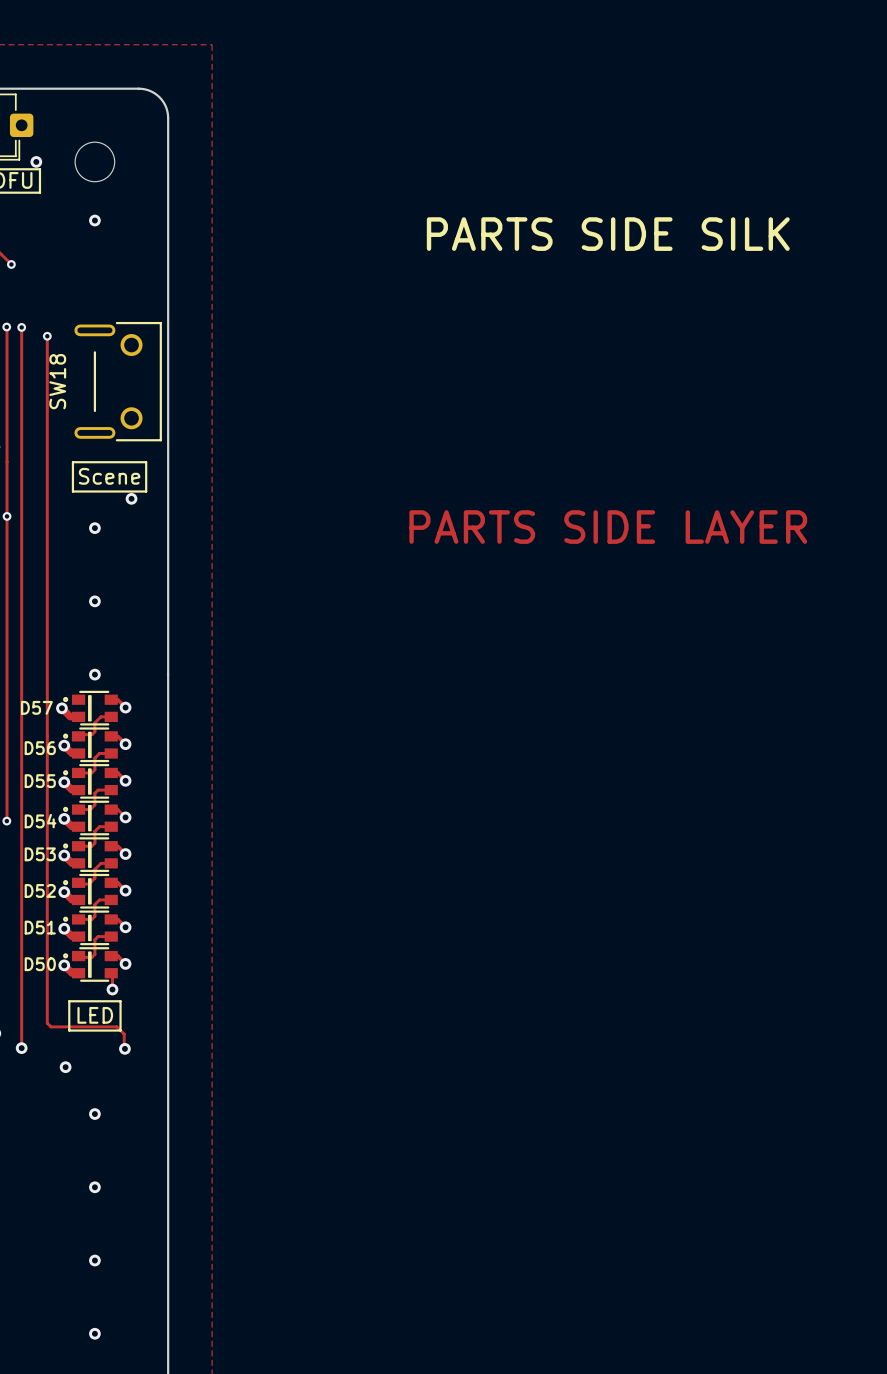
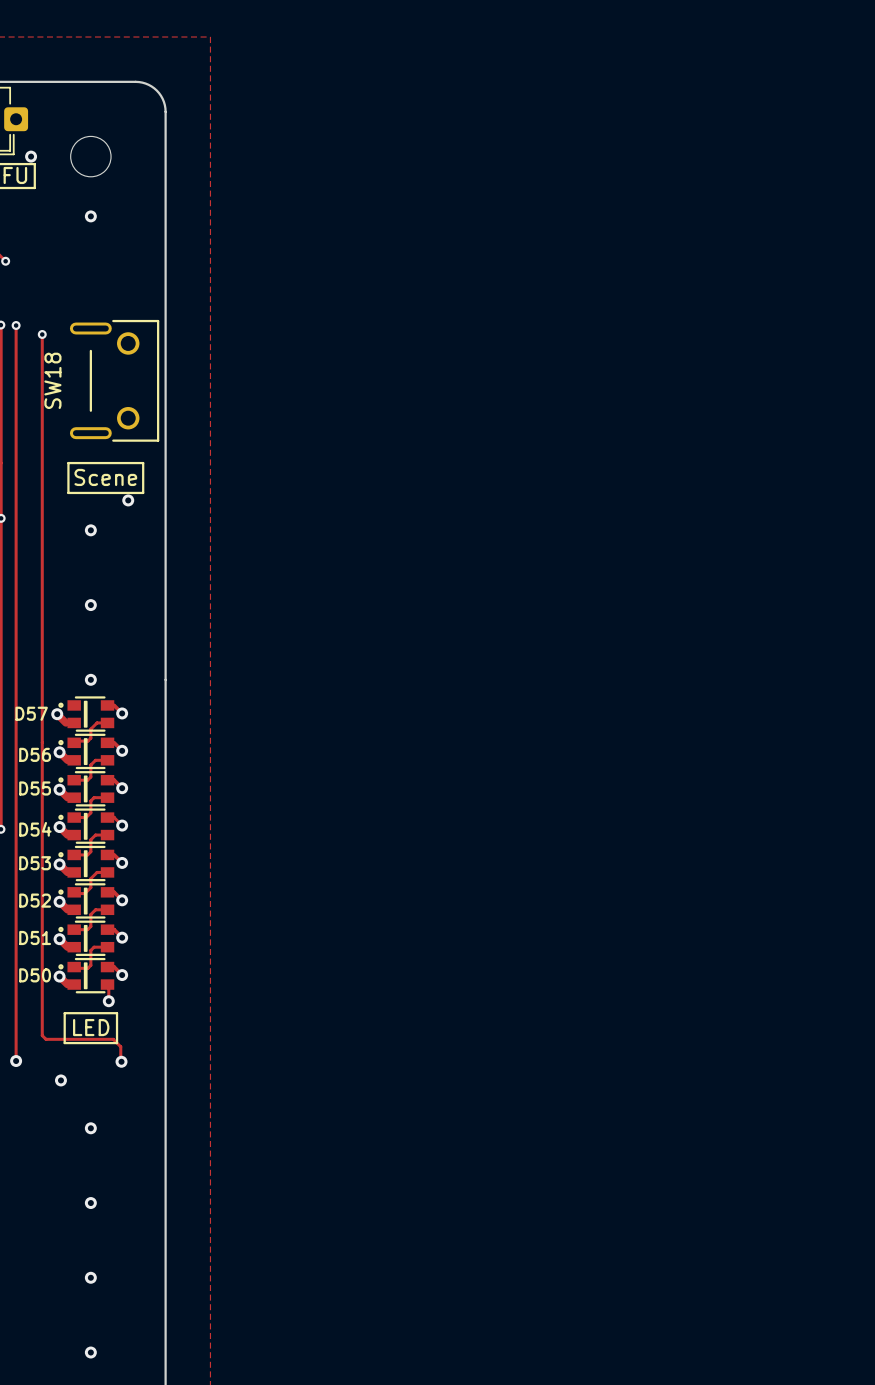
text: PARTS SIDE SILK (608, 234) -> none
text: PARTS SIDE LAYER (608, 527) -> none

